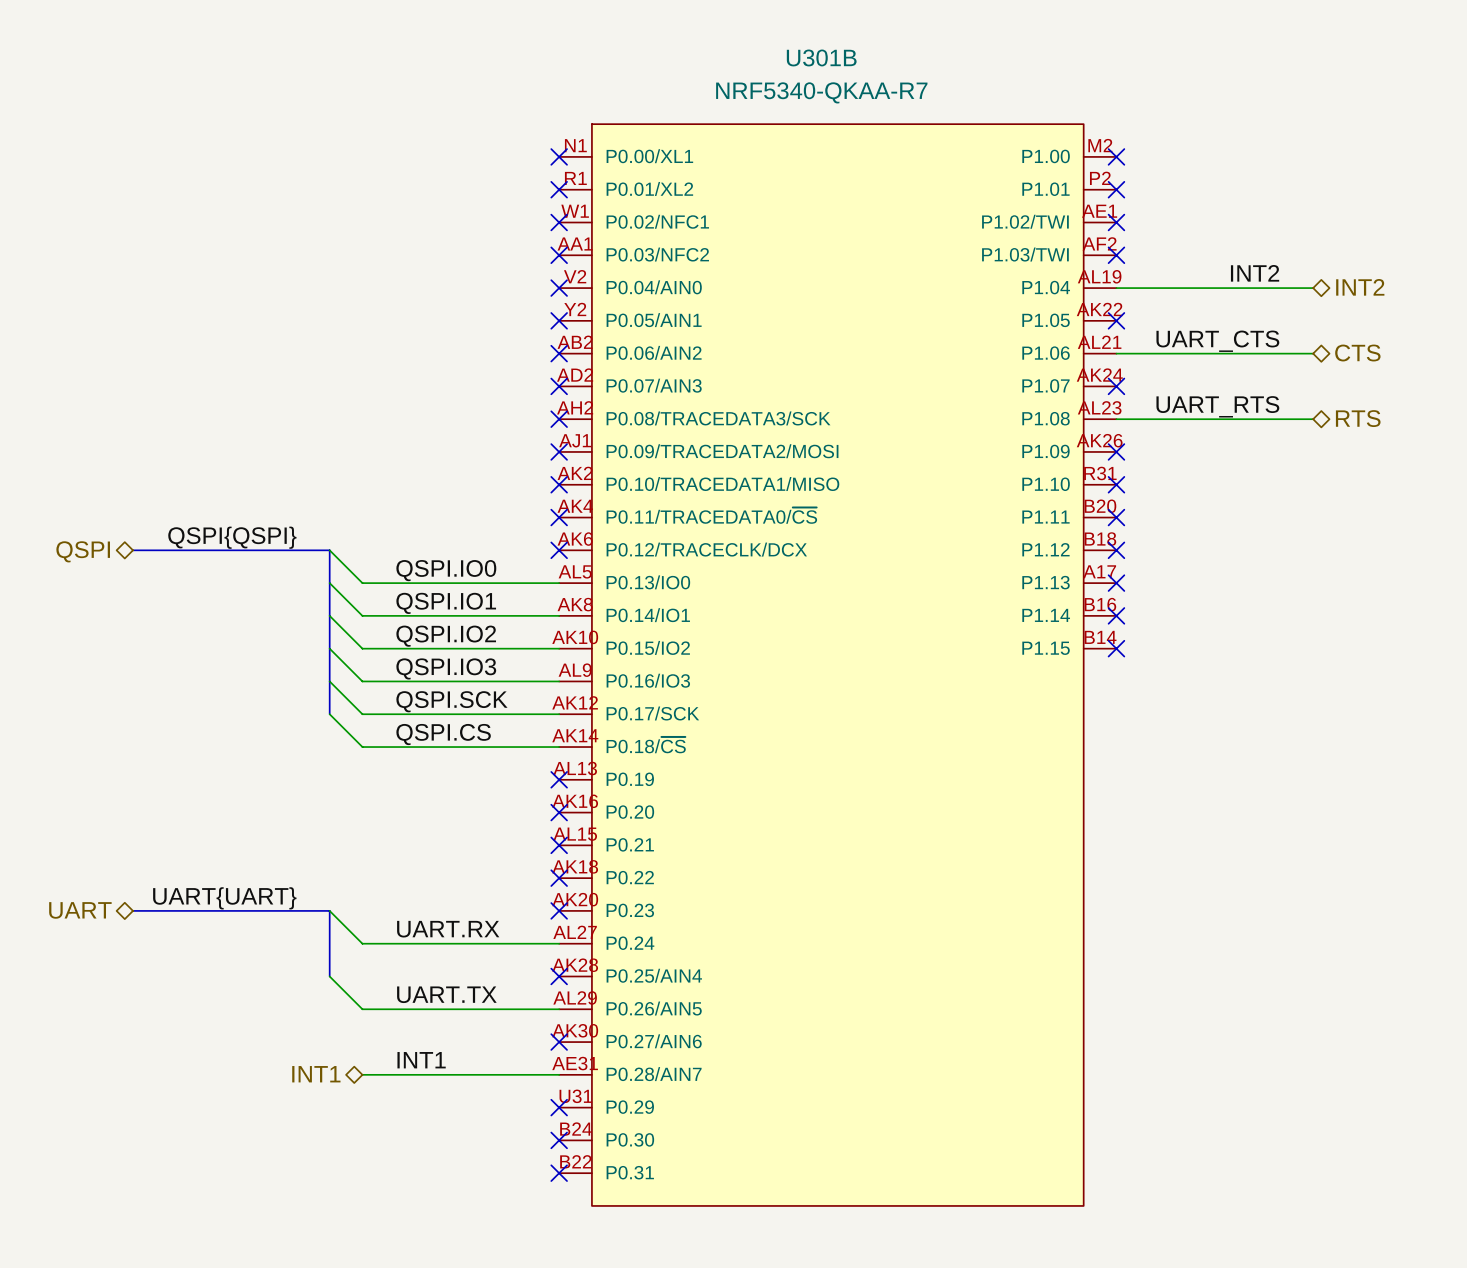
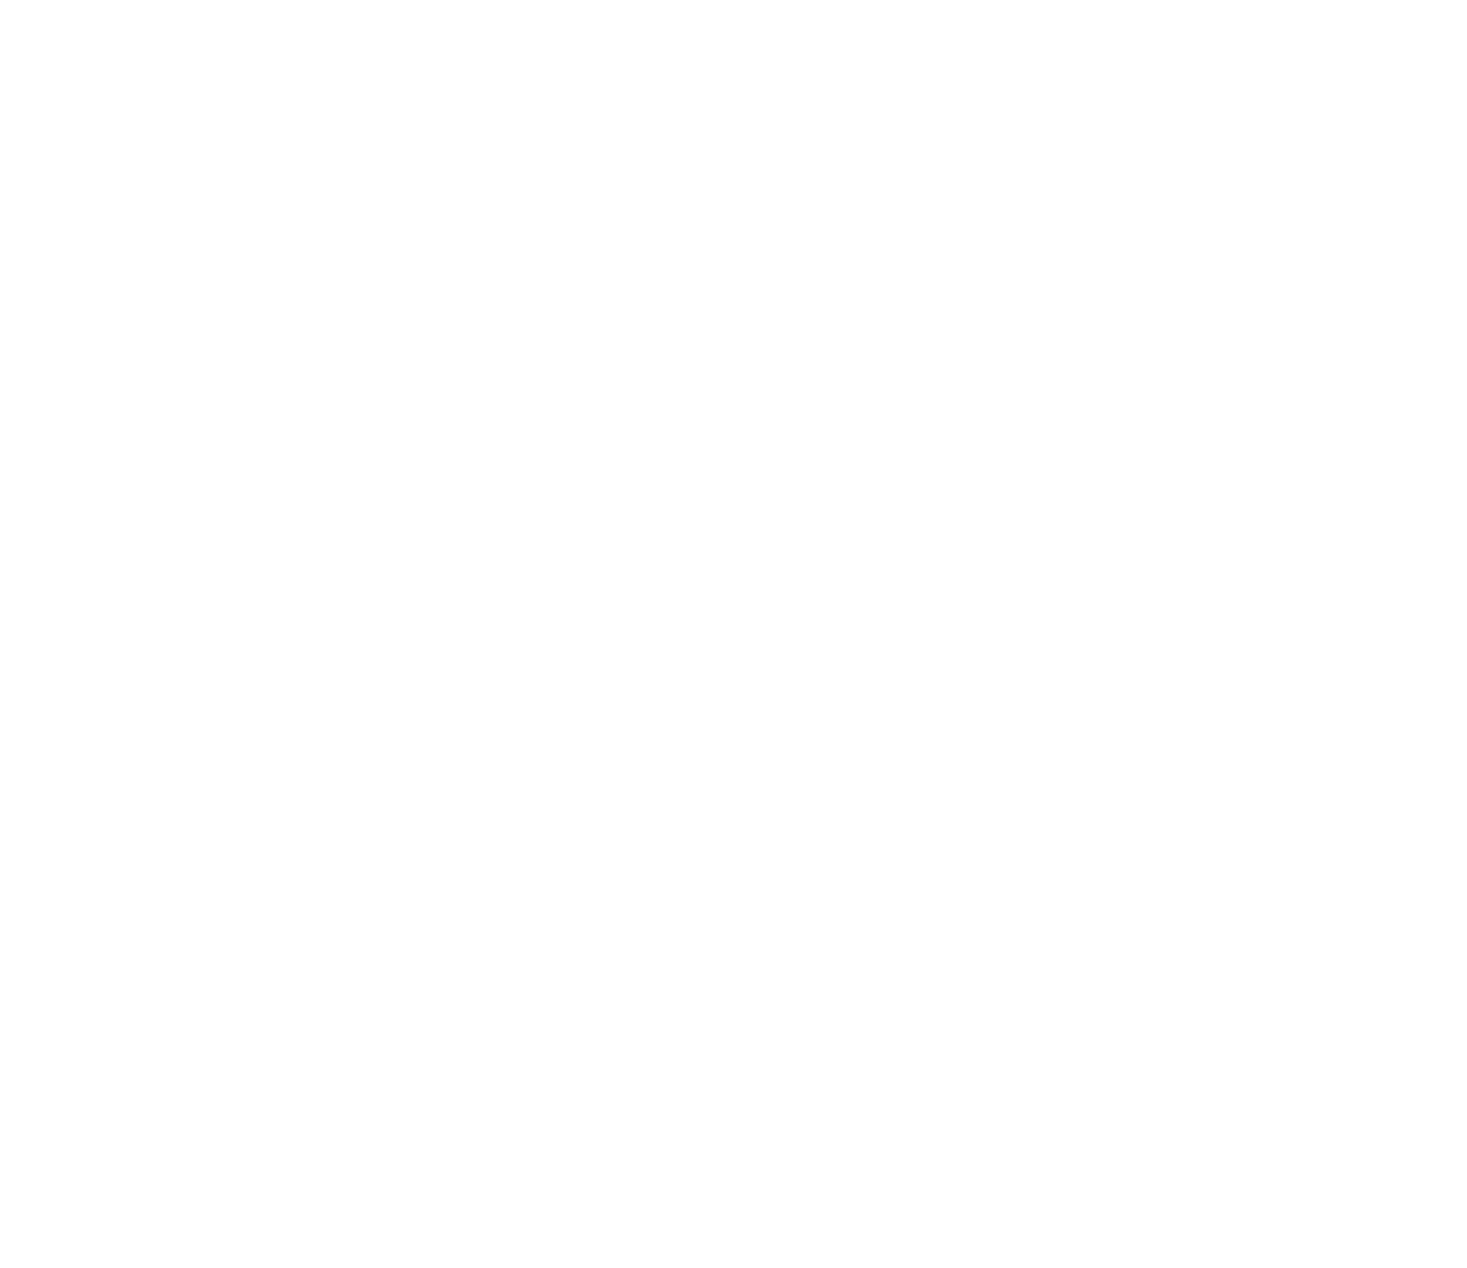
no-connect mark: (559, 156) -> none
no-connect mark: (1116, 156) -> none
no-connect mark: (559, 189) -> none
no-connect mark: (1116, 189) -> none
no-connect mark: (559, 222) -> none
no-connect mark: (1116, 222) -> none
no-connect mark: (559, 255) -> none
no-connect mark: (1116, 255) -> none
label: INT2 (1255, 273) -> none
hierarchical label: INT2 (1360, 287) -> none
no-connect mark: (559, 288) -> none
wire: (1116, 288) (1313, 288) -> none
no-connect mark: (559, 320) -> none
no-connect mark: (1116, 320) -> none
label: UART_CTS (1217, 341) -> none
no-connect mark: (559, 353) -> none
wire: (1116, 353) (1313, 353) -> none
hierarchical label: CTS (1357, 353) -> none
no-connect mark: (559, 386) -> none
no-connect mark: (1116, 386) -> none
label: UART_RTS (1217, 406) -> none
hierarchical label: RTS (1358, 418) -> none
no-connect mark: (559, 419) -> none
wire: (1116, 419) (1313, 419) -> none
no-connect mark: (559, 451) -> none
no-connect mark: (1116, 451) -> none
no-connect mark: (559, 484) -> none
no-connect mark: (1116, 484) -> none
no-connect mark: (559, 517) -> none
no-connect mark: (1116, 517) -> none
label: QSPI{QSPI} (232, 537) -> none
bus: (132, 550) (329, 550) (329, 714) -> none
wire: (329, 550) (362, 583) (559, 583) -> none
no-connect mark: (559, 550) -> none
no-connect mark: (1116, 550) -> none
hierarchical label: QSPI (83, 551) -> none
label: QSPI.IO0 (446, 570) -> none
wire: (329, 583) (362, 615) (559, 615) -> none
no-connect mark: (1116, 583) -> none
label: QSPI.IO1 (446, 603) -> none
wire: (329, 615) (362, 648) (559, 648) -> none
no-connect mark: (1116, 615) -> none
label: QSPI.IO2 (446, 636) -> none
wire: (329, 648) (362, 681) (559, 681) -> none
no-connect mark: (1116, 648) -> none
U301B: NRF5340-QKAA-R7 (837, 665) -> none
label: QSPI.IO3 (446, 668) -> none
wire: (329, 681) (362, 714) (559, 714) -> none
label: QSPI.SCK (451, 701) -> none
wire: (329, 714) (362, 747) (559, 747) -> none
label: QSPI.CS (443, 734) -> none
no-connect mark: (559, 779) -> none
no-connect mark: (559, 812) -> none
no-connect mark: (559, 845) -> none
no-connect mark: (559, 878) -> none
label: UART{UART} (224, 898) -> none
hierarchical label: UART (80, 910) -> none
bus: (132, 910) (329, 910) (329, 976) -> none
wire: (329, 910) (362, 943) (559, 943) -> none
no-connect mark: (559, 910) -> none
label: UART.RX (448, 929) -> none
wire: (329, 976) (362, 1009) (559, 1009) -> none
no-connect mark: (559, 976) -> none
label: UART.TX (446, 994) -> none
no-connect mark: (559, 1042) -> none
label: INT1 (421, 1060) -> none
hierarchical label: INT1 (316, 1074) -> none
wire: (362, 1074) (559, 1074) -> none
no-connect mark: (559, 1107) -> none
no-connect mark: (559, 1140) -> none
no-connect mark: (559, 1173) -> none

